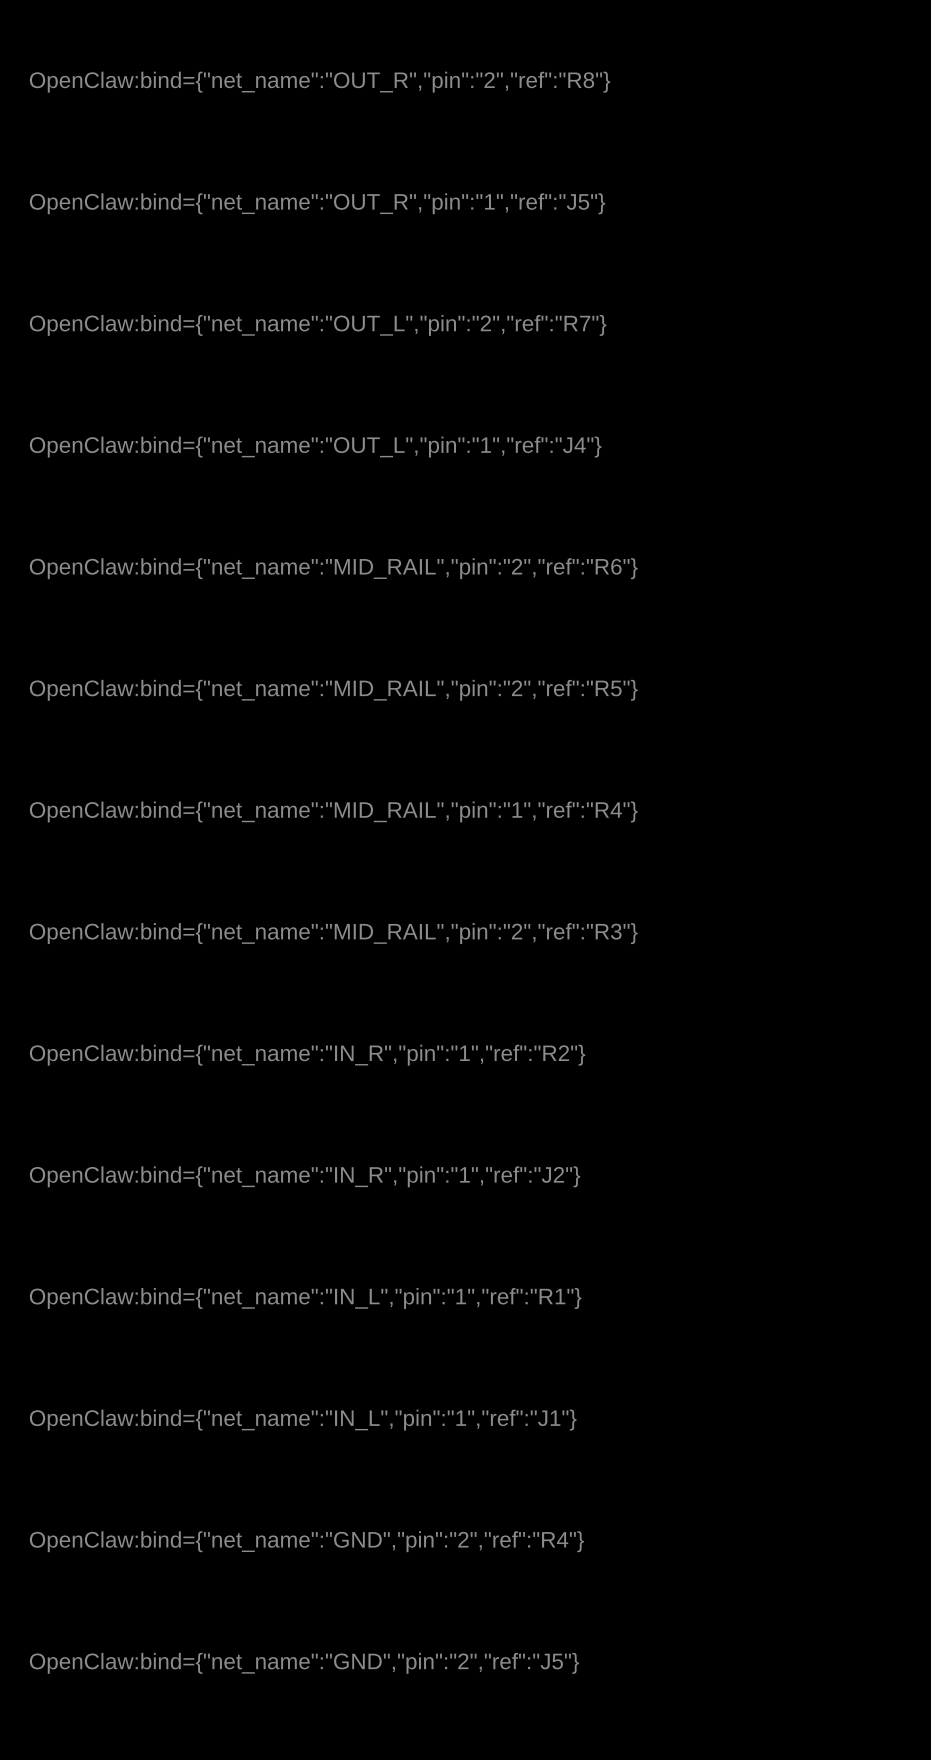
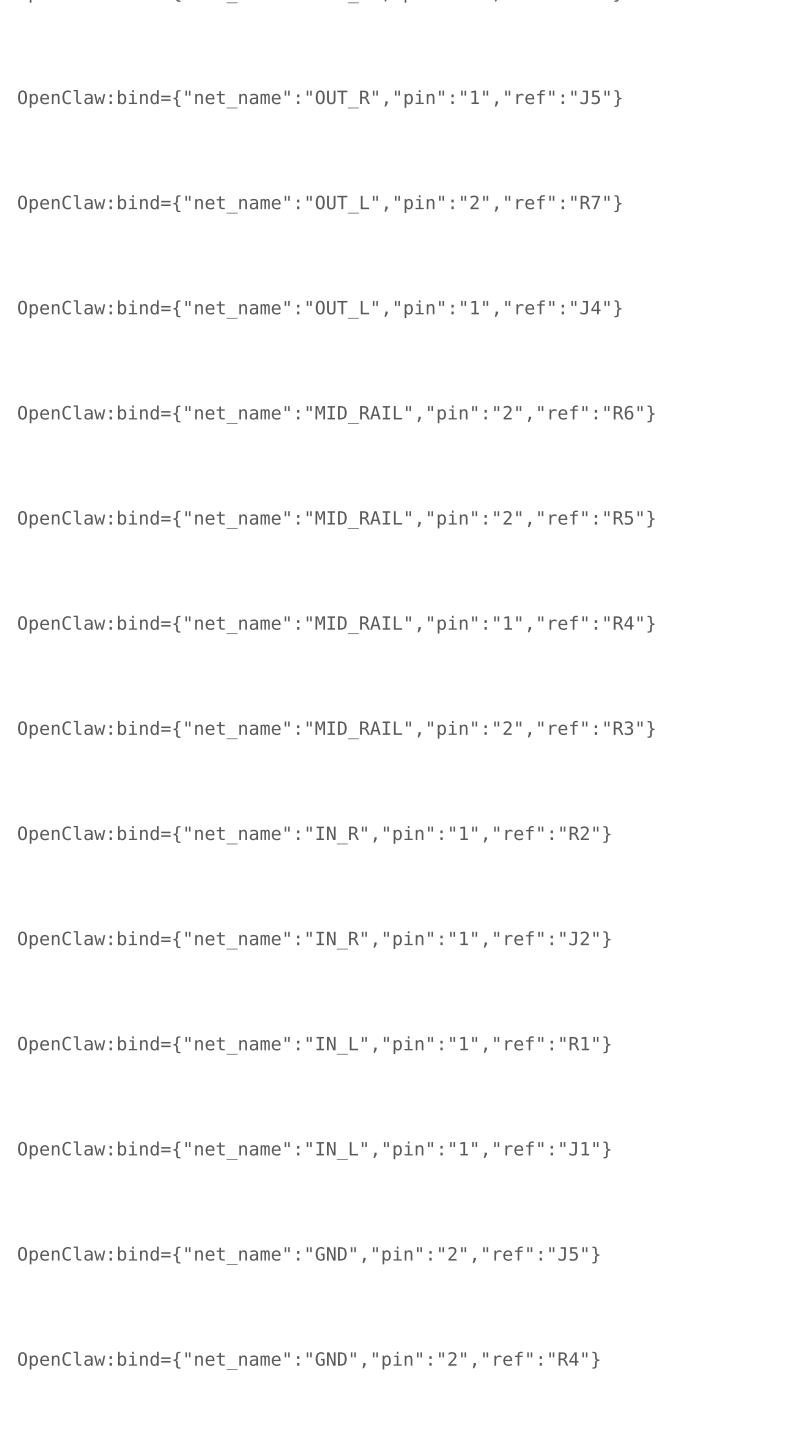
text: OpenClaw:bind={"net_name":"GND","pin":"2","ref":"R4"} (306, 1541) -> OpenClaw:bind={"net_name":"GND","pin":"2","ref":"J5"} (308, 1255)
text: OpenClaw:bind={"net_name":"GND","pin":"2","ref":"J5"} (304, 1663) -> OpenClaw:bind={"net_name":"GND","pin":"2","ref":"R4"} (308, 1360)

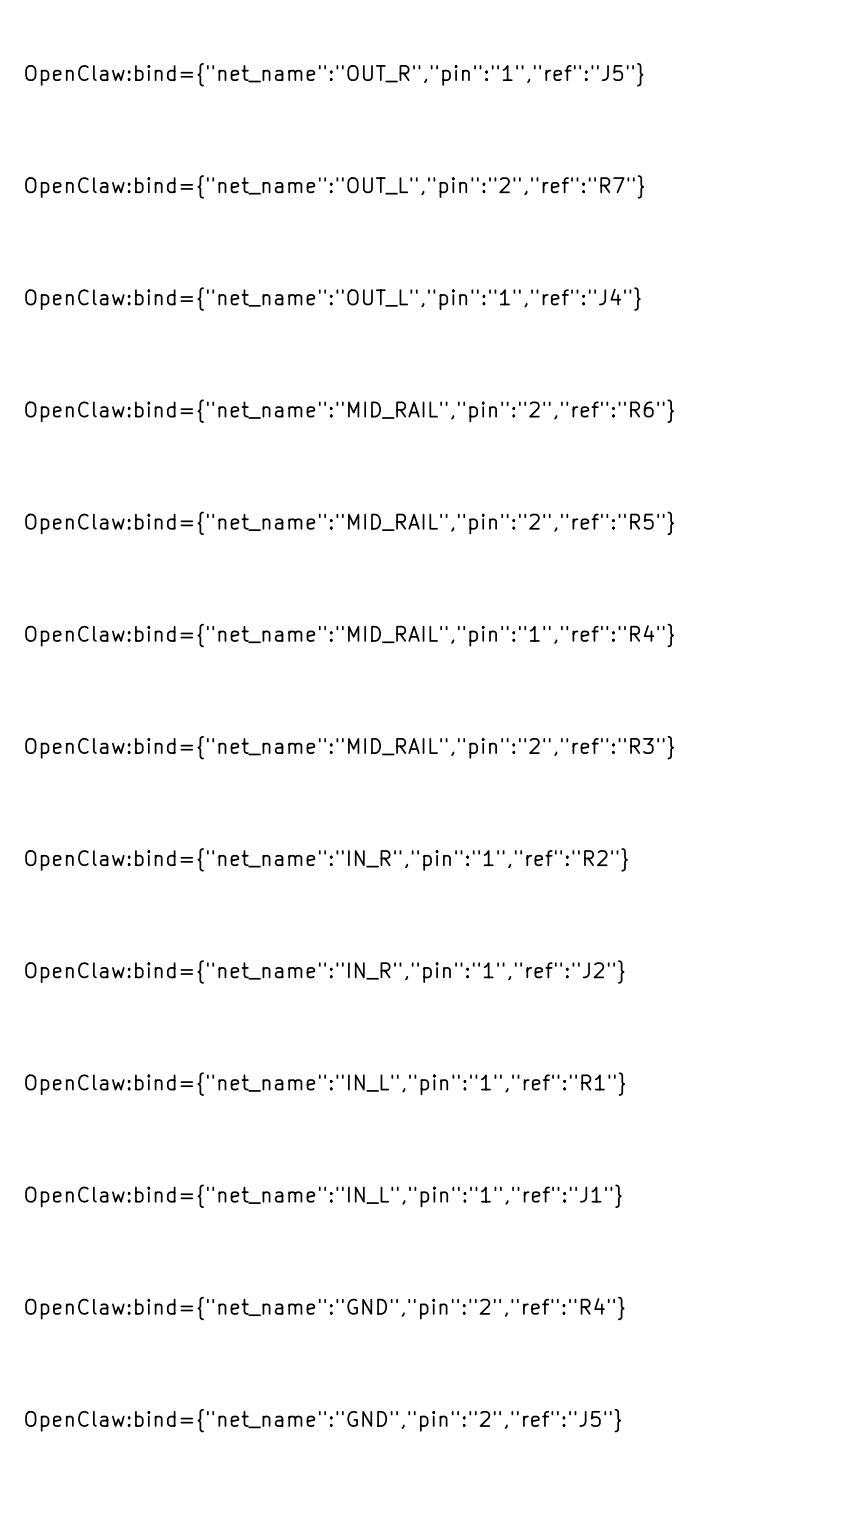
text: OpenClaw:bind={"net_name":"GND","pin":"2","ref":"J5"} (308, 1255) -> OpenClaw:bind={"net_name":"GND","pin":"2","ref":"R4"} (324, 1308)
text: OpenClaw:bind={"net_name":"GND","pin":"2","ref":"R4"} (308, 1360) -> OpenClaw:bind={"net_name":"GND","pin":"2","ref":"J5"} (323, 1420)

